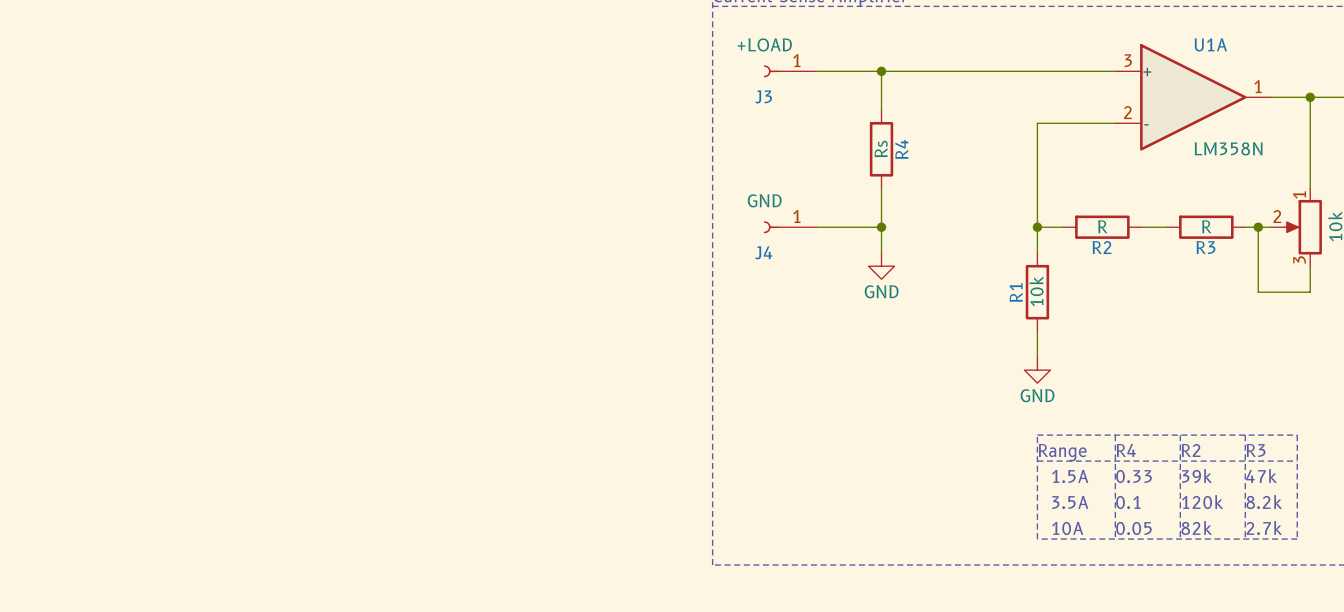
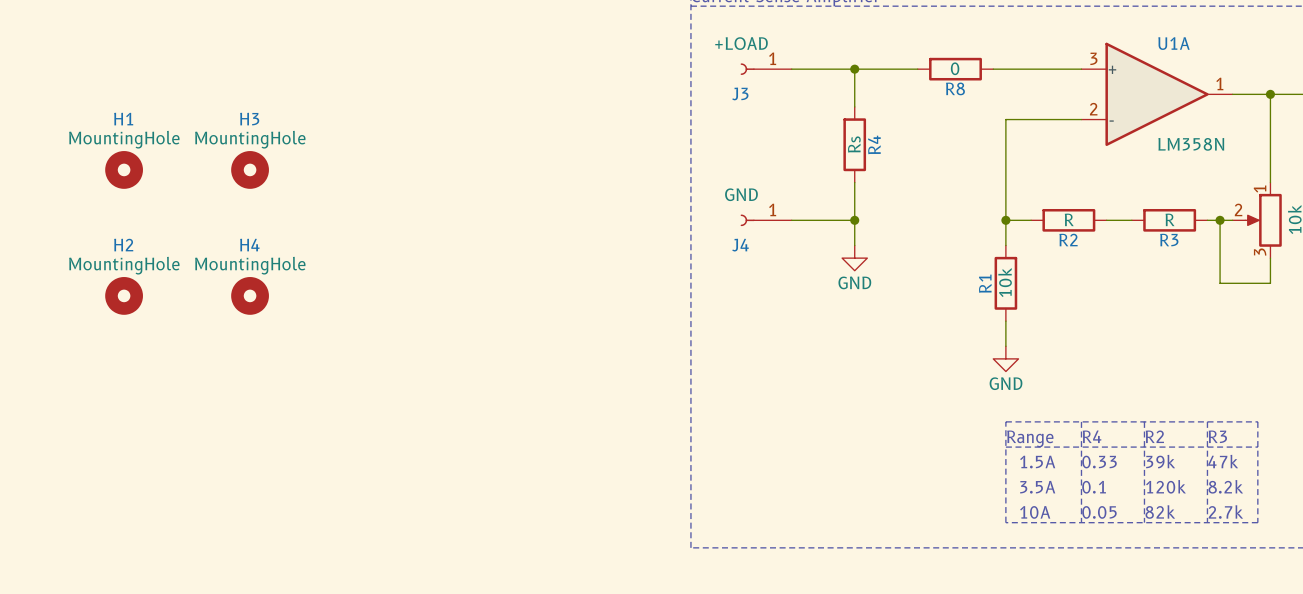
wire: (946, 71) (1024, 71) -> none
R8: none -> 0 (955, 69)
H1: none -> MountingHole (124, 169)
H3: none -> MountingHole (250, 169)
H2: none -> MountingHole (124, 295)
H4: none -> MountingHole (250, 295)

